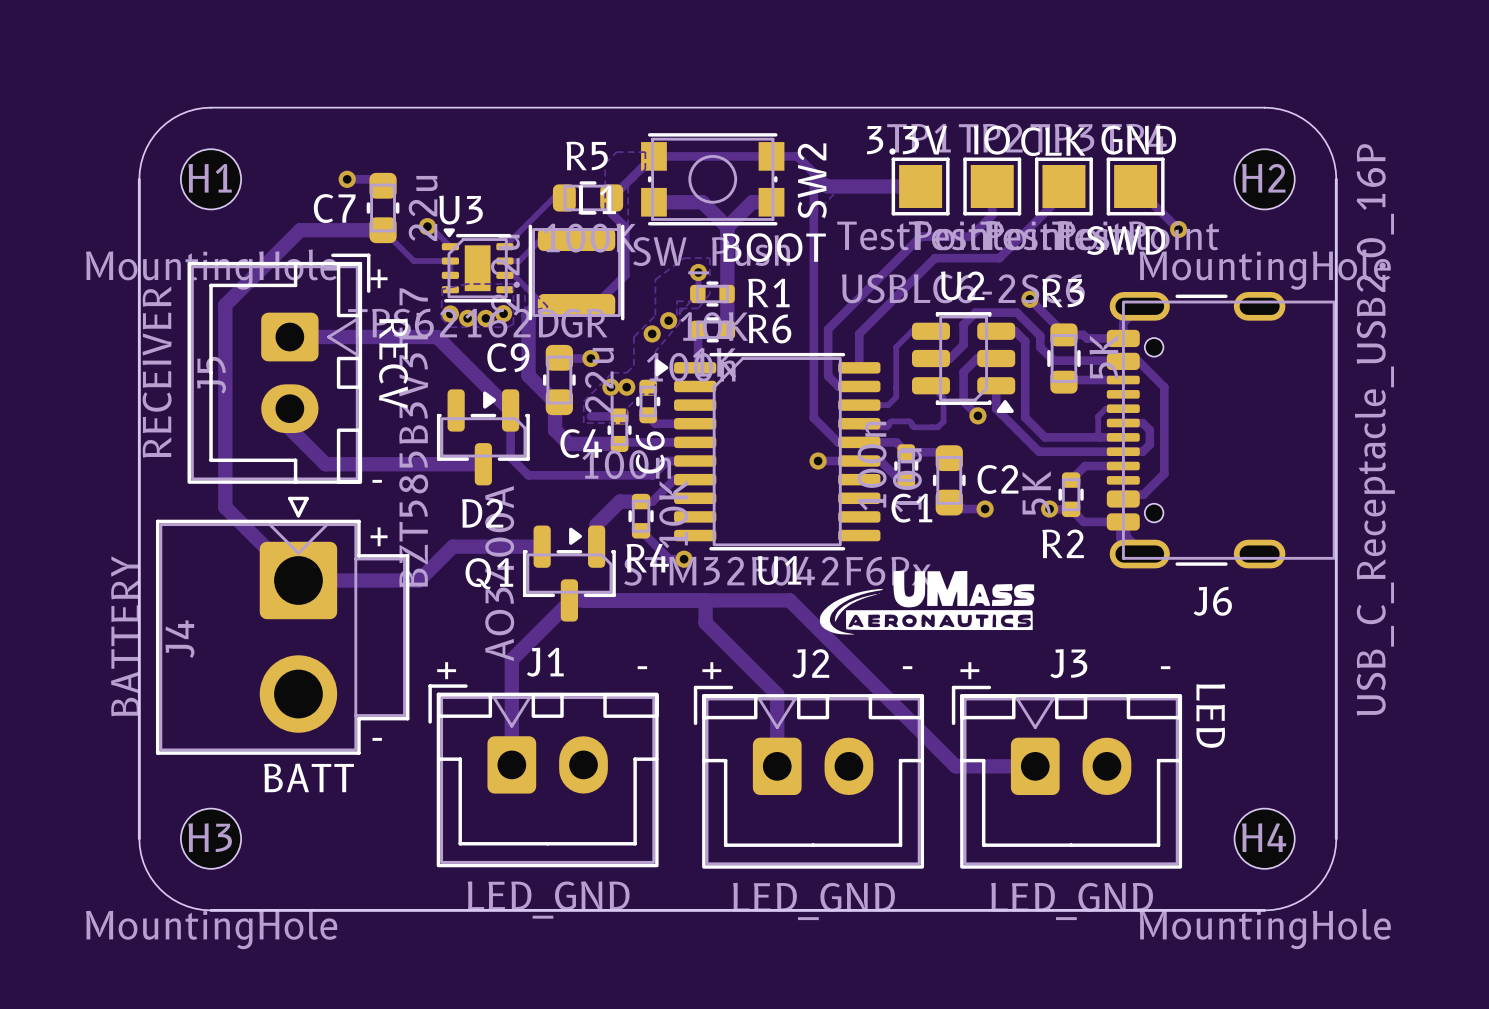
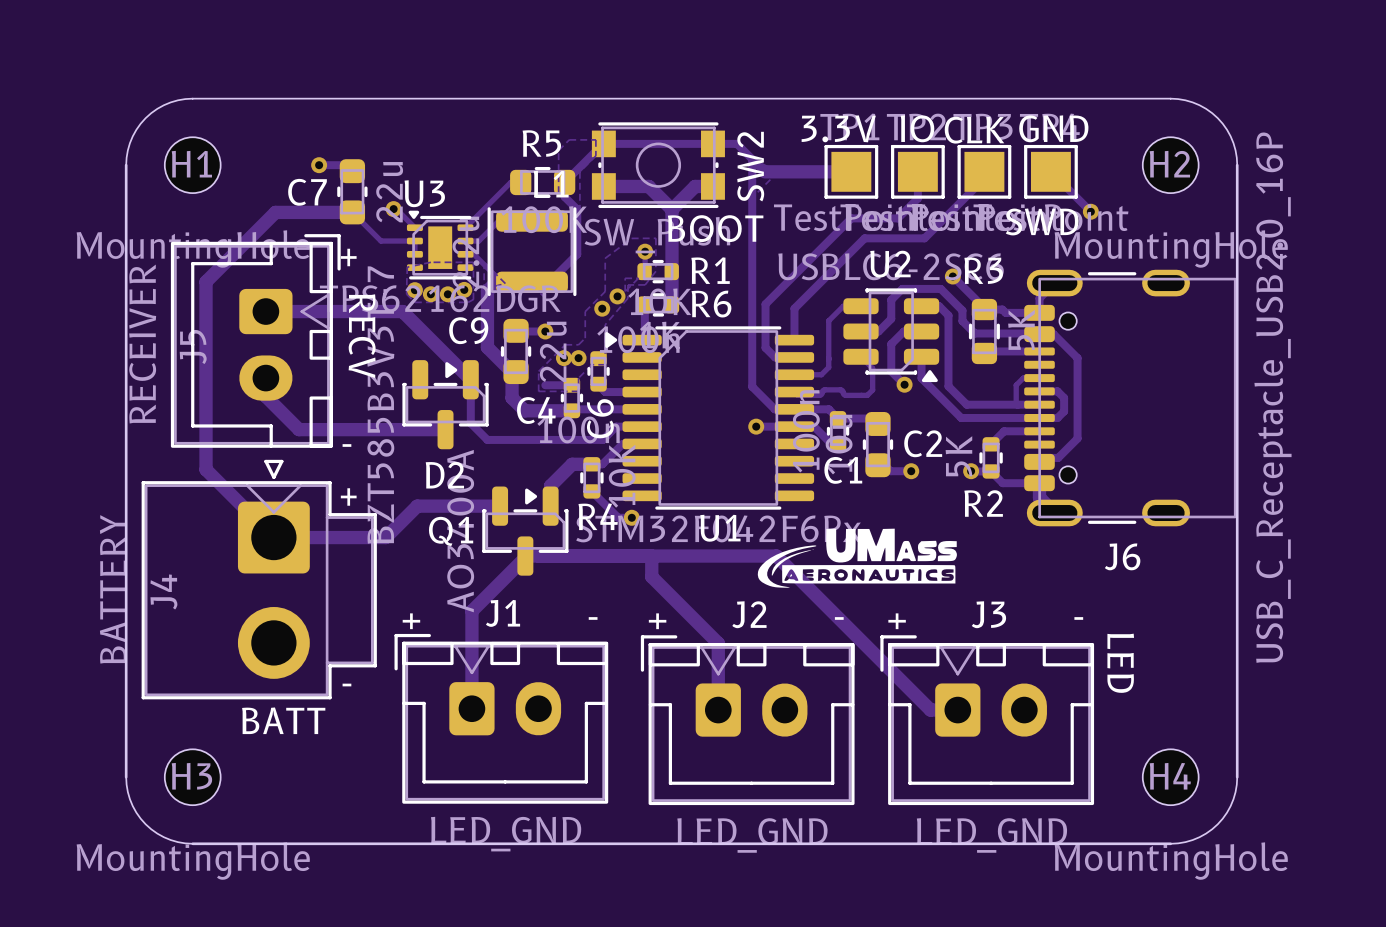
track: (789, 600) (955, 766) (1005, 766) -> (729, 556) (776, 556) (930, 710)

